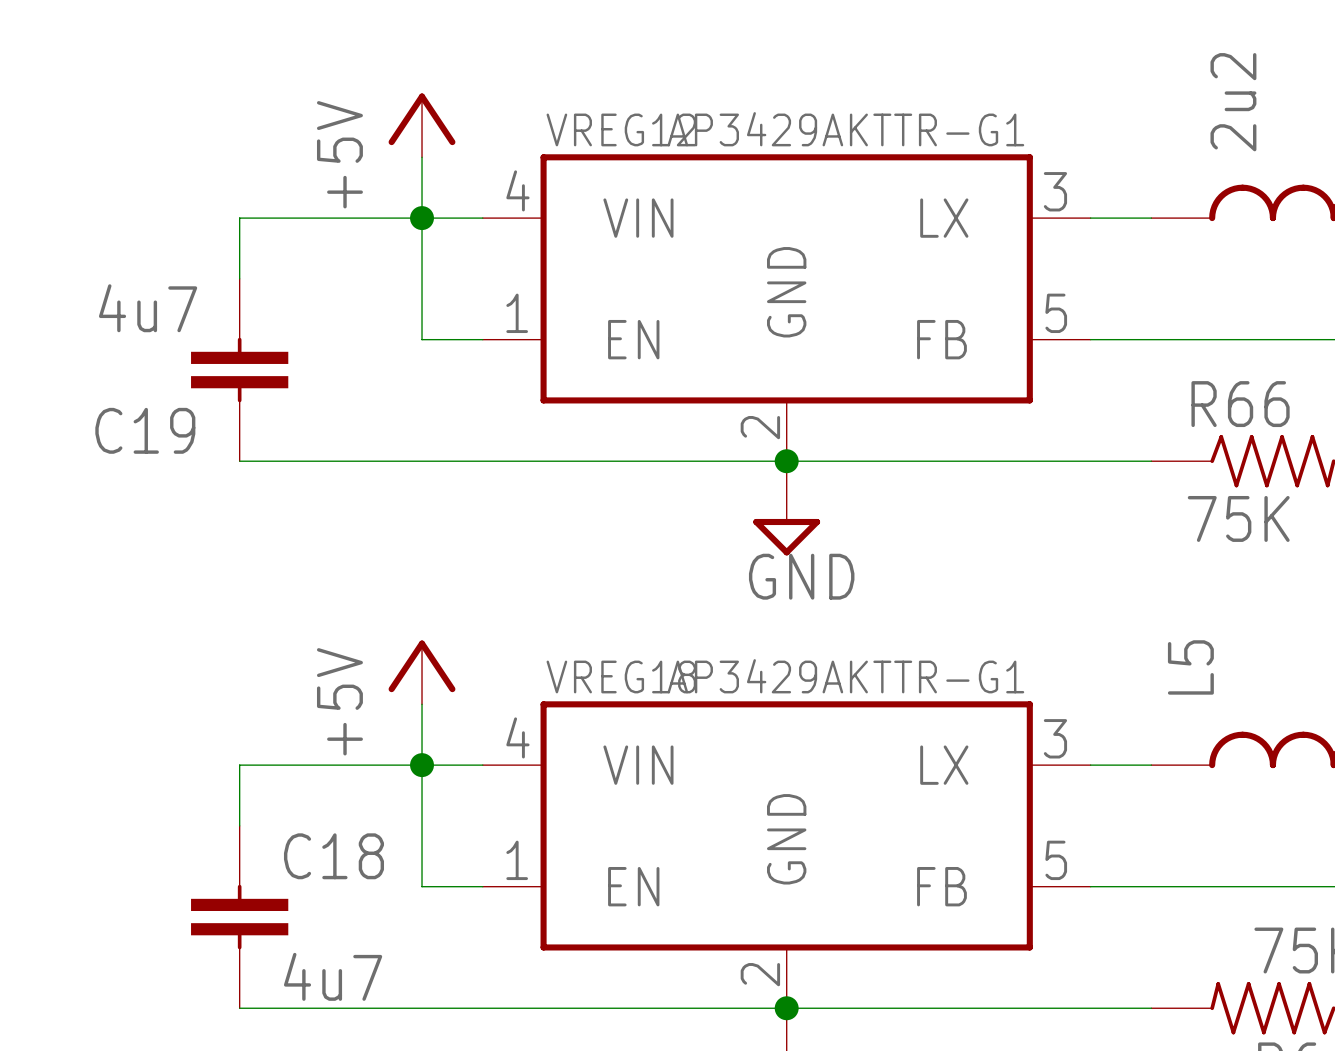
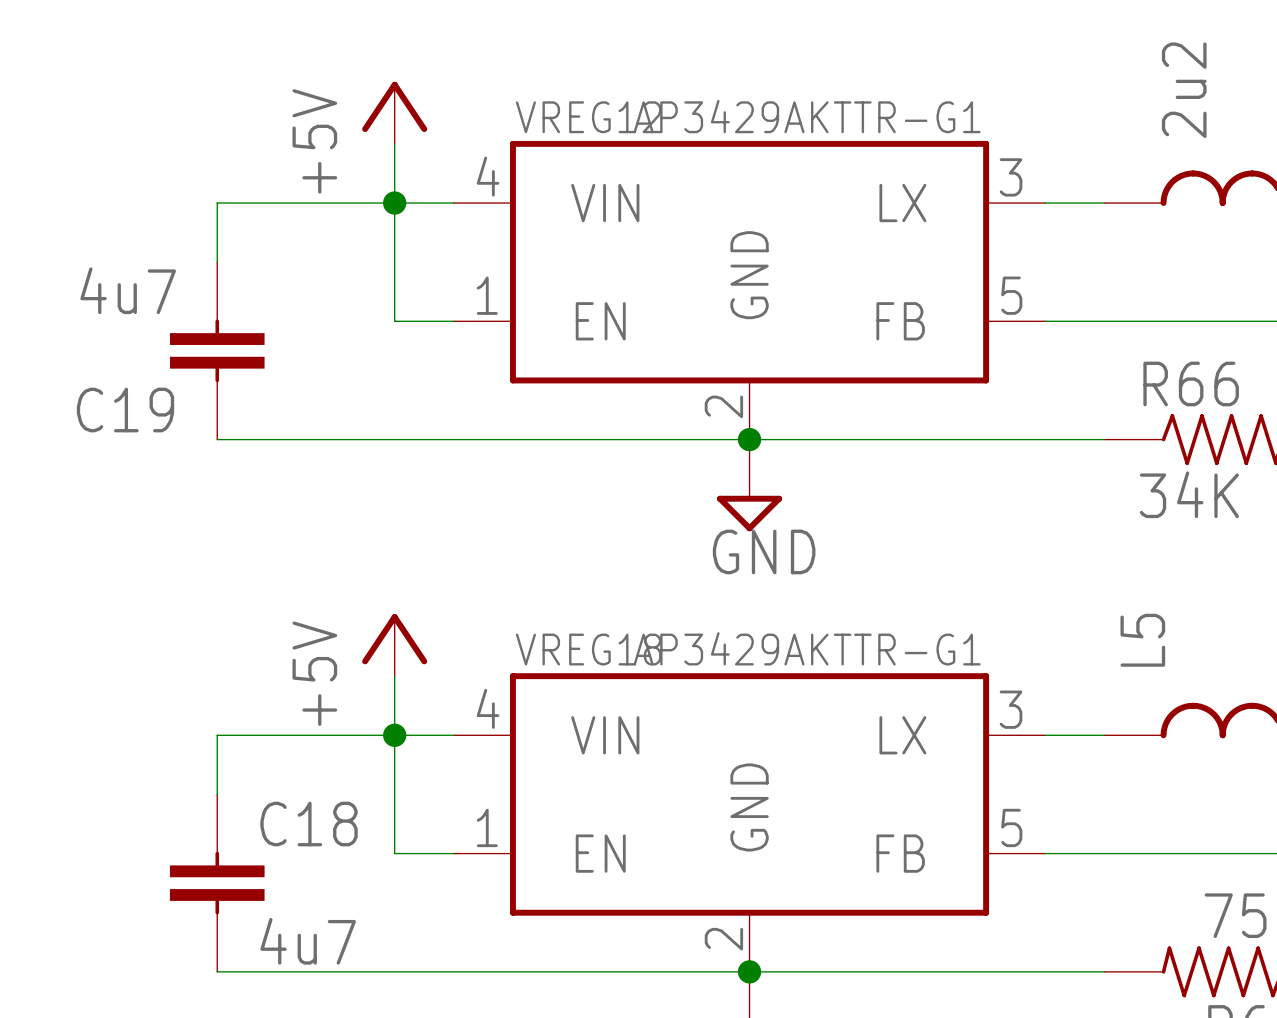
R66 value: 75K (1238, 518) -> 34K (1189, 494)

